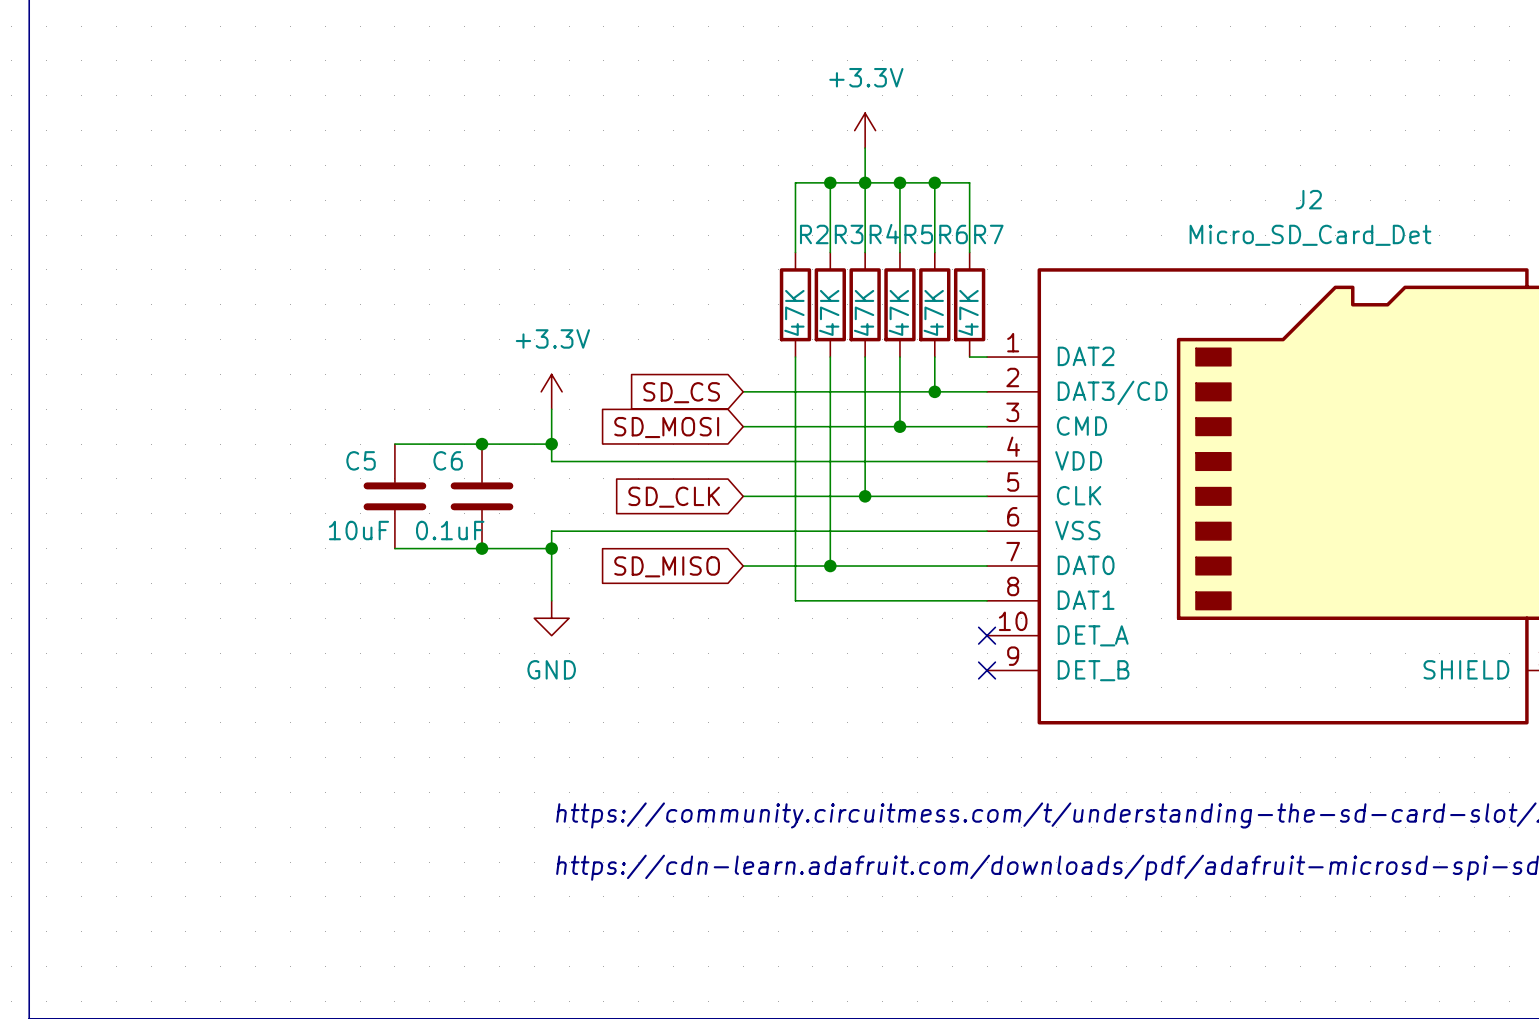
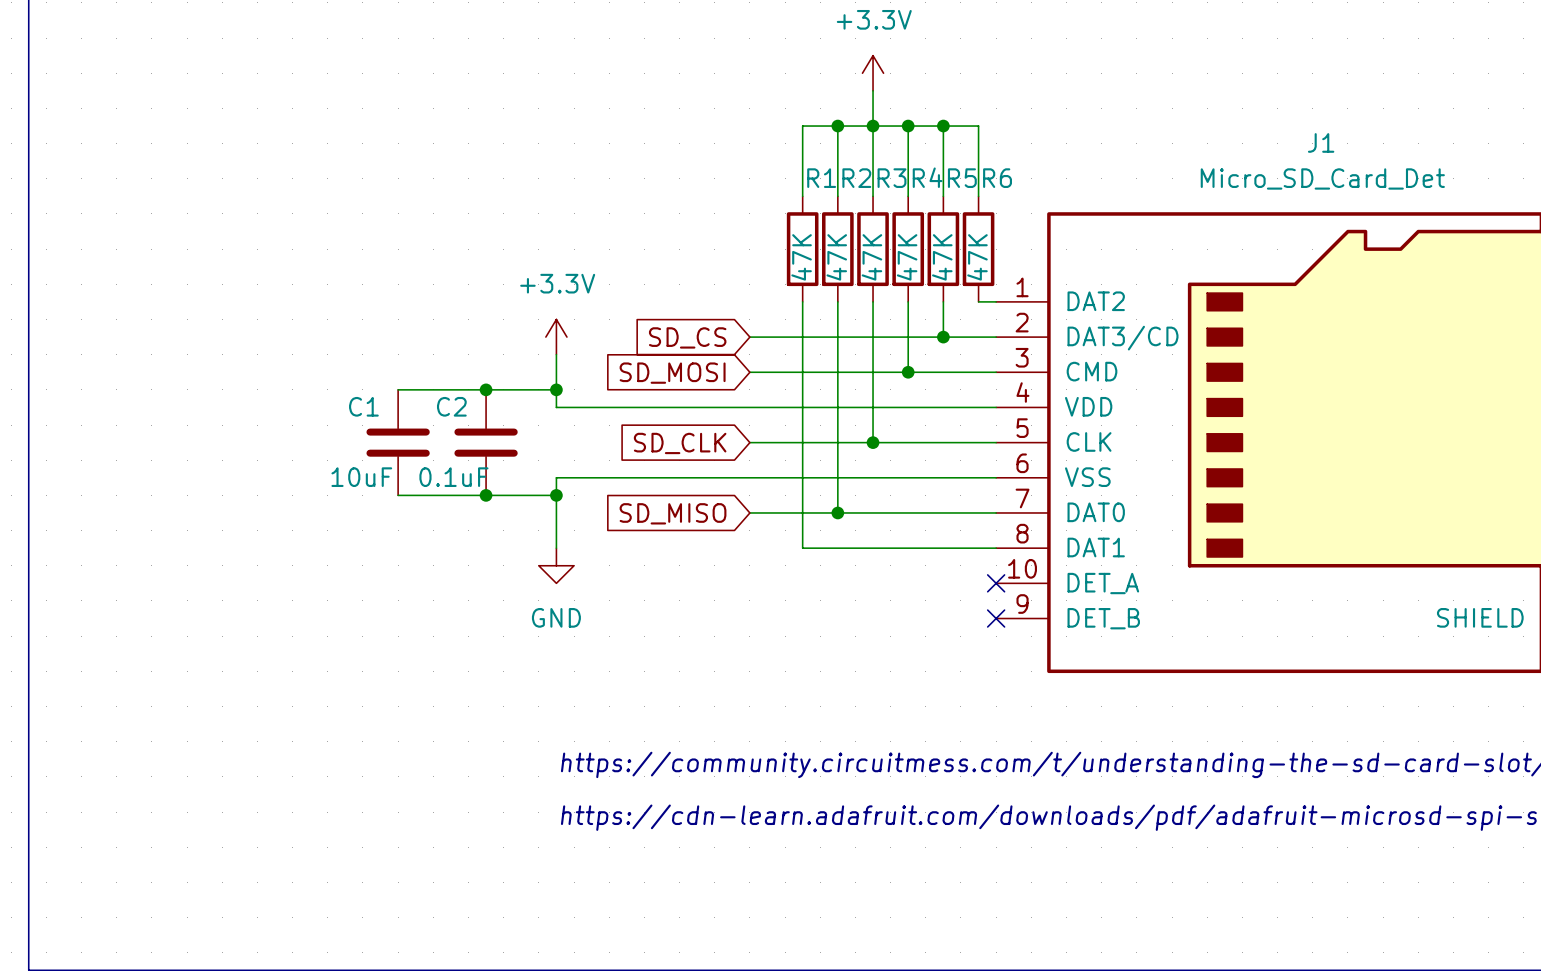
J2 name: J2 (1308, 199) -> J1 (1321, 142)
R2 name: R2 (814, 234) -> R1 (821, 178)
R3 name: R3 (849, 234) -> R2 (856, 178)
R4 name: R4 (884, 234) -> R3 (892, 178)
R5 name: R5 (918, 234) -> R4 (927, 177)
R6 name: R6 (953, 234) -> R5 (962, 178)
R7 name: R7 (988, 234) -> R6 (997, 178)
C5 name: C5 (361, 460) -> C1 (363, 406)
C6 name: C6 (448, 460) -> C2 (451, 406)

